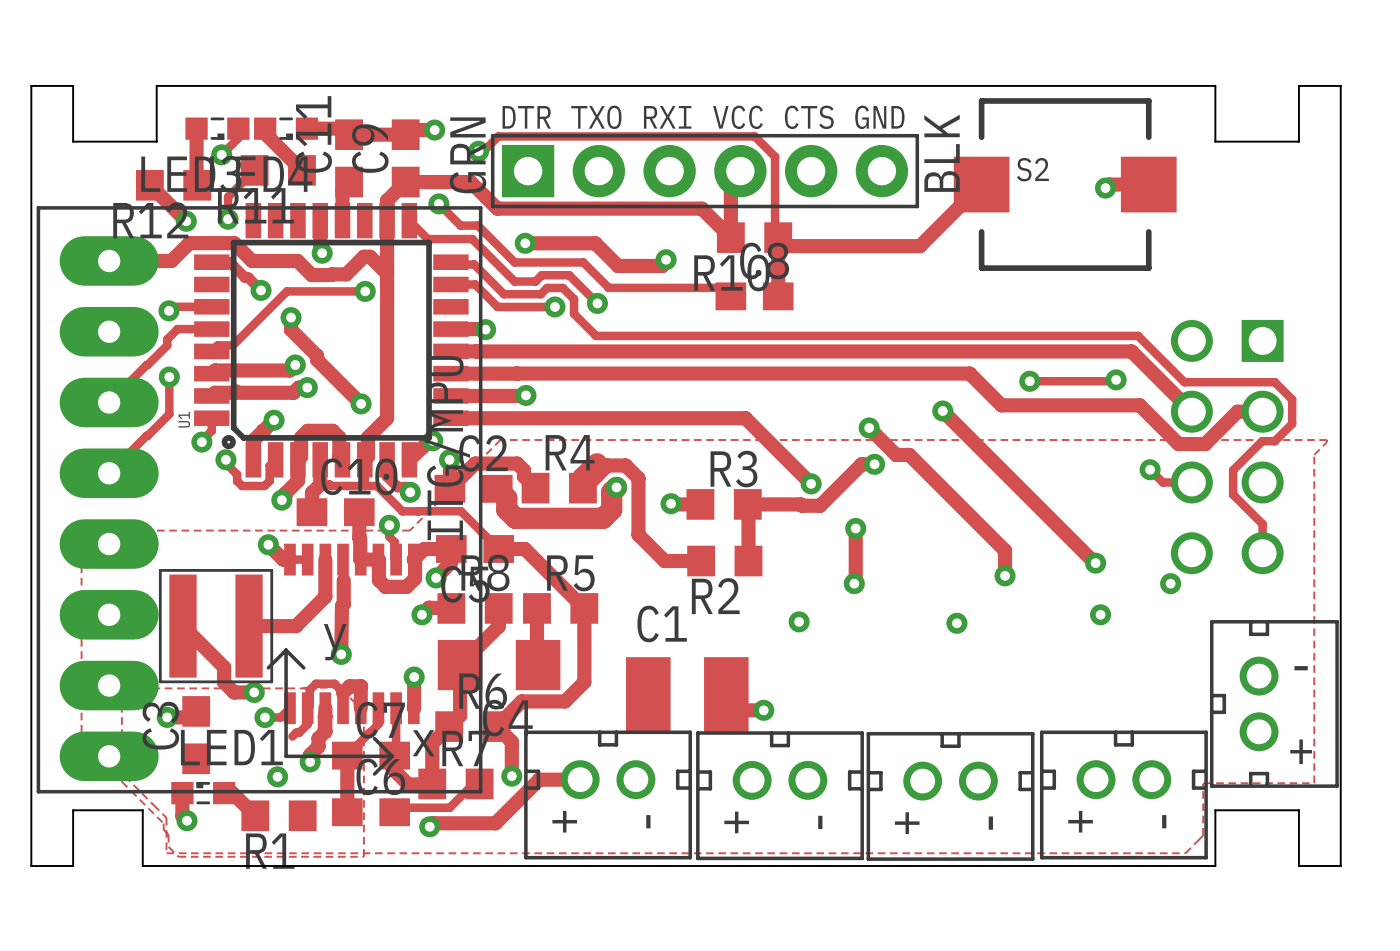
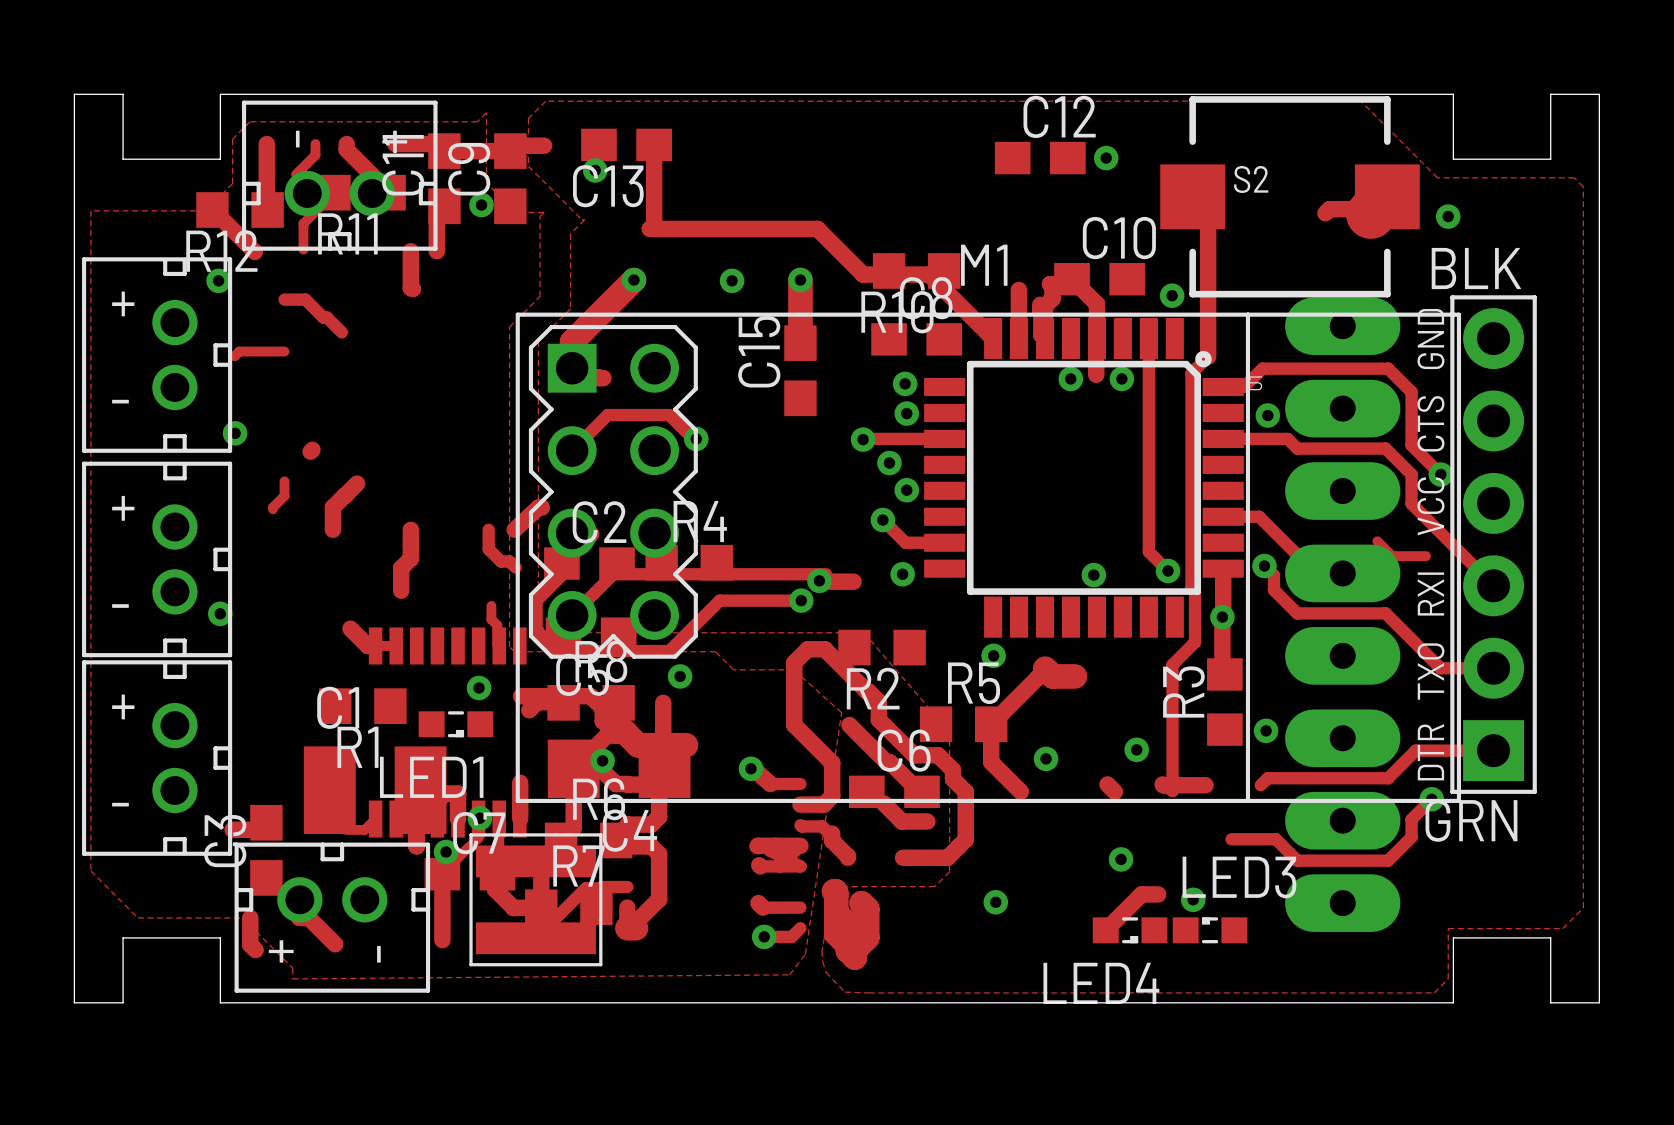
zone outline: none -> (486, 112) (477, 121) (249, 121) (232, 139) (232, 183) (205, 210) (90, 210) (90, 870) (137, 917) (242, 917) (292, 968) (292, 978) (789, 974) (805, 954) (841, 712) (793, 669) (733, 669) (715, 651) (514, 651) (509, 646) (509, 327) (540, 296) (540, 216) (544, 212) (516, 212) (486, 182) (486, 112)
LED3 rotation: 0° (217, 128) -> 180° (1210, 930)
LED3 position: (217, 128) -> (1210, 930)
LED4 position: (286, 128) -> (1130, 930)
C13: none -> (626, 144)
track: none -> (654, 144) (654, 226) (656, 228) (649, 228) (817, 228) (863, 274) (929, 274) (993, 338)
via: (434, 130) -> none
C12: none -> (1040, 158)
via: none -> (1106, 158)
track: (478, 151) (483, 151) (498, 136) (754, 136) (775, 156) (775, 234) (778, 237) (778, 296) (775, 269) (775, 234) (787, 246) (920, 246) (981, 184) -> none
via: (221, 154) -> none
part: none -> (339, 175)
part: (705, 171) -> none
track: (740, 171) (730, 180) (730, 237) (701, 208) (497, 208) (470, 182) (405, 182) (387, 200) (387, 418) (367, 437) (367, 456) (364, 459) (365, 486) -> none
track: none -> (1192, 196) (1208, 212) (1208, 356) (1191, 373) (1191, 588) (1195, 591) (1195, 642) (1172, 664) (1172, 791) (1162, 784) (1163, 785) (1205, 785)
via: none -> (481, 205)
S2 position: (1065, 184) -> (1290, 196)
via: (1105, 188) -> none
via: none -> (1448, 216)
track: (438, 203) (460, 225) (477, 225) (514, 262) (583, 262) (608, 287) (722, 287) (730, 296) -> none
via: (438, 203) -> none
via: (228, 219) -> none
track: (409, 220) (427, 239) (472, 239) (514, 281) (535, 281) (541, 275) (569, 275) (597, 303) -> none
via: (186, 221) -> none
track: (525, 243) (595, 243) (617, 265) (662, 265) (666, 259) -> none
via position: (525, 243) -> (633, 280)
track: none -> (633, 280) (572, 341) (572, 368)
track: none -> (800, 280) (800, 343)
via: none -> (218, 280)
via: none -> (732, 280)
via: (322, 253) -> none
track: none -> (1018, 289) (1019, 338)
via: none -> (1172, 295)
via position: (666, 259) -> (800, 280)
track: (109, 260) (171, 260) (189, 243) (234, 243) (252, 260) (297, 260) (311, 275) (346, 274) (363, 256) (370, 256) (387, 273) -> none
track: (450, 262) (453, 264) (474, 264) (504, 294) (540, 294) (547, 287) (562, 287) (574, 299) (574, 313) (596, 335) (1138, 335) (1184, 382) (1274, 382) (1292, 399) (1292, 423) (1274, 441) (1262, 441) (1233, 470) (1233, 494) (1262, 524) (1262, 553) -> none
track: none -> (1040, 304) (1041, 334) (1045, 338) (1045, 306) (1052, 298) (1052, 286) (1050, 284) (1067, 284) (1072, 279) (1096, 304) (1096, 374)
track: (450, 284) (475, 284) (497, 306) (554, 306) -> none
via: (261, 290) -> none
track: (365, 291) (286, 291) (232, 345) (217, 345) (211, 351) -> none
via: (365, 291) -> none
track: none -> (1148, 338) (1148, 551) (1168, 570)
via: (597, 303) -> none
via: (554, 306) -> none
part: none -> (157, 355)
via: (168, 310) -> none
track: (291, 317) (291, 329) (317, 355) (317, 359) (361, 403) -> none
via: (291, 317) -> none
C15: none -> (800, 370)
track: (211, 329) (177, 329) (167, 339) (167, 345) (109, 402) -> none
via: (485, 329) -> none
via: none -> (1070, 378)
via: none -> (1121, 378)
via: none -> (905, 383)
track: none -> (1223, 386) (1244, 386) (1262, 368) (1388, 368) (1411, 392) (1411, 445) (1440, 474)
U1 rotation: 0° (331, 340) -> 180° (1083, 477)
U1 position: (331, 340) -> (1083, 477)
track: (450, 351) (1131, 351) (1191, 411) -> none
via: none -> (906, 413)
via: none -> (1267, 415)
track: (295, 365) (289, 370) (214, 370) (211, 373) -> none
via: (295, 365) -> none
track: (450, 373) (516, 373) -> none
track: (516, 373) (969, 373) (1001, 405) (1139, 405) (1178, 444) (1205, 444) (1237, 411) (1262, 411) -> none
track: (169, 377) (169, 414) (109, 473) -> none
track: (1116, 379) (1029, 381) -> none
via: (1116, 379) -> none
track: none -> (696, 439) (693, 439) (669, 415) (607, 415) (572, 450)
via: none -> (696, 439)
track: none -> (944, 438) (863, 439)
track: none -> (1223, 438) (1287, 438) (1297, 448) (1385, 448) (1411, 474) (1411, 503) (1493, 585)
via: (1029, 381) -> none
via: none -> (863, 439)
track: (307, 387) (298, 387) (293, 392) (214, 392) (211, 395) -> none
via: (307, 387) -> none
track: (525, 395) (450, 395) -> none
via: (525, 395) -> none
via: none -> (889, 463)
via: (361, 403) -> none
track: (942, 411) (1095, 563) -> none
via: (942, 411) -> none
via: none -> (1440, 474)
track: (450, 418) (745, 418) (811, 483) -> none
via: (274, 420) -> none
via: none -> (906, 490)
track: (869, 427) (896, 454) (909, 454) (1005, 550) (1005, 575) -> none
via: (869, 427) -> none
via: (432, 440) -> none
zone outline: (1327, 440) (500, 440) (409, 530) (104, 530) (81, 553) (81, 732) (166, 817) (166, 853) (1185, 853) (1203, 835) (1203, 783) (1314, 783) (1314, 454) (1327, 442) -> (1583, 506) (1583, 186) (1574, 177) (1437, 177) (1360, 101) (545, 101) (528, 118) (528, 166) (582, 219) (584, 219) (570, 233) (570, 308) (538, 341) (538, 626) (557, 632) (863, 632) (949, 730) (949, 871) (934, 886) (835, 886) (833, 884) (833, 912) (829, 916) (825, 932) (821, 950) (822, 961) (826, 972) (844, 992) (1434, 992) (1448, 978) (1448, 928) (1562, 928) (1583, 908) (1583, 509)
via: (201, 442) -> none
M1 side: bottom (1227, 447) -> top (988, 557)
track: none -> (1223, 516) (1259, 516) (1296, 554) (1342, 573)
track: none -> (882, 520) (905, 542) (944, 542)
via: none -> (882, 520)
track: (225, 459) (225, 463) (237, 474) (237, 481) (242, 486) (264, 486) (269, 481) (269, 465) (275, 459) -> none
via: (225, 459) -> none
track: (342, 459) (339, 456) (339, 437) (332, 430) (307, 430) (301, 437) (301, 456) (297, 459) (297, 480) (285, 493) (281, 500) -> none
via: (449, 459) -> none
track: (473, 461) (475, 463) (517, 463) (523, 470) (523, 476) (535, 488) -> none
track: none -> (572, 533) (572, 565) (536, 600) (536, 630) (557, 651) (669, 651) (719, 600) (801, 600)
track: (597, 463) (582, 477) (582, 488) (607, 465) (625, 465) (638, 478) (638, 534) (664, 561) (701, 561) -> none
track: (874, 464) (861, 464) (820, 505) (747, 504) (747, 560) -> none
via: (874, 464) -> none
R3 name position: R3 (733, 469) -> R3 (1183, 691)
via: (1150, 469) -> none
part: none -> (1493, 544)
via: (811, 483) -> none
track: (320, 484) (377, 486) (402, 511) (460, 511) (498, 548) (524, 548) (584, 608) (584, 682) (565, 701) (521, 701) (496, 726) (511, 741) (511, 776) -> none
part: none -> (157, 559)
track: (616, 487) (611, 492) (611, 509) (602, 518) (515, 518) (506, 509) (506, 498) (497, 488) -> none
via position: (616, 487) -> (801, 600)
track: none -> (1264, 566) (1273, 575) (1273, 590) (1297, 613) (1385, 613) (1440, 668) (1493, 668)
via: none -> (1264, 566)
via: (410, 492) -> none
track: none -> (1223, 568) (1222, 673) (1224, 674)
via: none -> (1168, 570)
track: none -> (826, 574) (613, 574) (572, 615)
via: none -> (902, 574)
via: none -> (1093, 575)
part: (259, 499) -> none
via: (281, 500) -> none
R3 rotation: 0° (724, 504) -> 90° clockwise (1224, 702)
R3 position: (724, 504) -> (1224, 702)
C10 position: (335, 512) -> (1099, 279)
track: (359, 512) (360, 559) (378, 560) (378, 580) (385, 586) (406, 586) (415, 578) (413, 559) (424, 548) (451, 548) (451, 562) (436, 578) -> none
via: (389, 525) -> none
track: (855, 528) (854, 583) -> none
via: (855, 528) -> none
via: none -> (220, 613)
part: none -> (1342, 614)
via: none -> (1222, 617)
via: (268, 544) -> none
track: (325, 559) (325, 596) (295, 626) (249, 626) -> none
track: (342, 560) (343, 604) (341, 606) (341, 654) -> none
via: (1095, 563) -> none
via: none -> (993, 655)
via: (1005, 575) -> none
via: (436, 578) -> none
via: (854, 583) -> none
via: (1170, 583) -> none
via: none -> (680, 676)
track: none -> (1074, 676) (1053, 676) (1045, 668) (991, 724) (991, 762) (1020, 791)
via: none -> (479, 688)
track: none -> (521, 696) (590, 696) (602, 708) (602, 721) (613, 731) (624, 731) (638, 745) (685, 745)
R5 position: (560, 608) -> (963, 724)
via: (421, 614) -> none
via: (1100, 614) -> none
via: (799, 621) -> none
via position: (956, 623) -> (1136, 749)
track: (183, 626) (224, 667) (224, 682) (234, 692) (254, 692) -> none
part rotation: 0° (216, 626) -> 90° clockwise (535, 899)
part position: (216, 626) -> (535, 899)
track: none -> (849, 725) (886, 762) (890, 762) (919, 791) (921, 791)
via: none -> (1266, 730)
track: none -> (1493, 750) (1415, 750) (1388, 778) (1267, 778) (1260, 785)
via: (341, 654) -> none
part: none -> (157, 758)
via: none -> (1046, 758)
track: none -> (602, 760) (602, 770) (615, 784) (651, 784) (659, 792) (659, 816) (651, 824) (627, 825) (628, 846) (651, 846) (659, 854) (659, 899) (636, 922) (636, 928) (627, 928) (627, 907)
via: none -> (602, 760)
track: none -> (752, 767) (770, 784) (800, 784)
via: none -> (751, 768)
via: (414, 677) -> none
track: none -> (1107, 784) (1114, 791)
zone outline: (303, 687) (339, 687) (363, 711) (363, 856) (178, 856) (168, 846) (168, 834) (163, 829) (163, 823) (121, 781) (121, 692) (126, 688) (307, 688) (303, 687) -> none
track: none -> (1431, 799) (1411, 819) (1411, 837) (1388, 860) (1297, 860) (1275, 839) (1231, 839)
via: none -> (1431, 799)
via: (254, 692) -> none
C1 position: (687, 694) -> (375, 790)
track: none -> (800, 804) (823, 804) (832, 796) (832, 762) (794, 725) (794, 662) (807, 649) (824, 649) (878, 701) (878, 719) (914, 755) (938, 755) (953, 770) (953, 779) (965, 791) (965, 839) (947, 857) (903, 857)
part: (1274, 703) -> none
via: none -> (479, 818)
track: (343, 708) (343, 692) (334, 683) (316, 683) (309, 690) (307, 724) (292, 736) -> none
via: (763, 710) -> none
track: none -> (800, 825) (822, 826) (829, 833) (832, 833) (832, 840) (847, 857) (830, 840)
via: (167, 717) -> none
via: (264, 717) -> none
track: (325, 731) (318, 738) (318, 746) (310, 754) (310, 761) -> none
track: none -> (758, 845) (800, 845) (779, 866)
track: none -> (775, 845) (769, 850) (800, 866) (759, 865)
via: none -> (446, 852)
via: none -> (1121, 859)
via: (310, 761) -> none
track: none -> (627, 887) (585, 888) (535, 938)
track: none -> (833, 891) (836, 893) (836, 933) (847, 945) (847, 950) (854, 957) (854, 950) (867, 937) (867, 908) (861, 903)
track: none -> (1158, 894) (1141, 894) (1105, 930)
via: (277, 776) -> none
via: (511, 776) -> none
via: none -> (1193, 899)
track: (580, 779) (539, 779) (495, 823) (433, 823) (429, 826) -> none
via: none -> (995, 902)
track: none -> (758, 903) (762, 907) (800, 907)
track: (479, 783) (473, 783) (449, 807) (399, 807) (394, 812) -> none
part: none -> (332, 917)
LED1 rotation: 0° (203, 793) -> 180° (455, 724)
LED1 position: (203, 793) -> (455, 724)
part: (608, 795) -> none
part: (780, 795) -> none
part: (1123, 795) -> none
part: (950, 796) -> none
track: none -> (800, 928) (791, 936) (764, 936)
via: none -> (764, 936)
board edge: (142, 810) (142, 866) (156, 866) -> (204, 937) (220, 937) (220, 1002)
C6 position: (371, 812) -> (894, 791)
R1 position: (279, 815) -> (362, 706)
via: (187, 820) -> none
via: (429, 826) -> none

